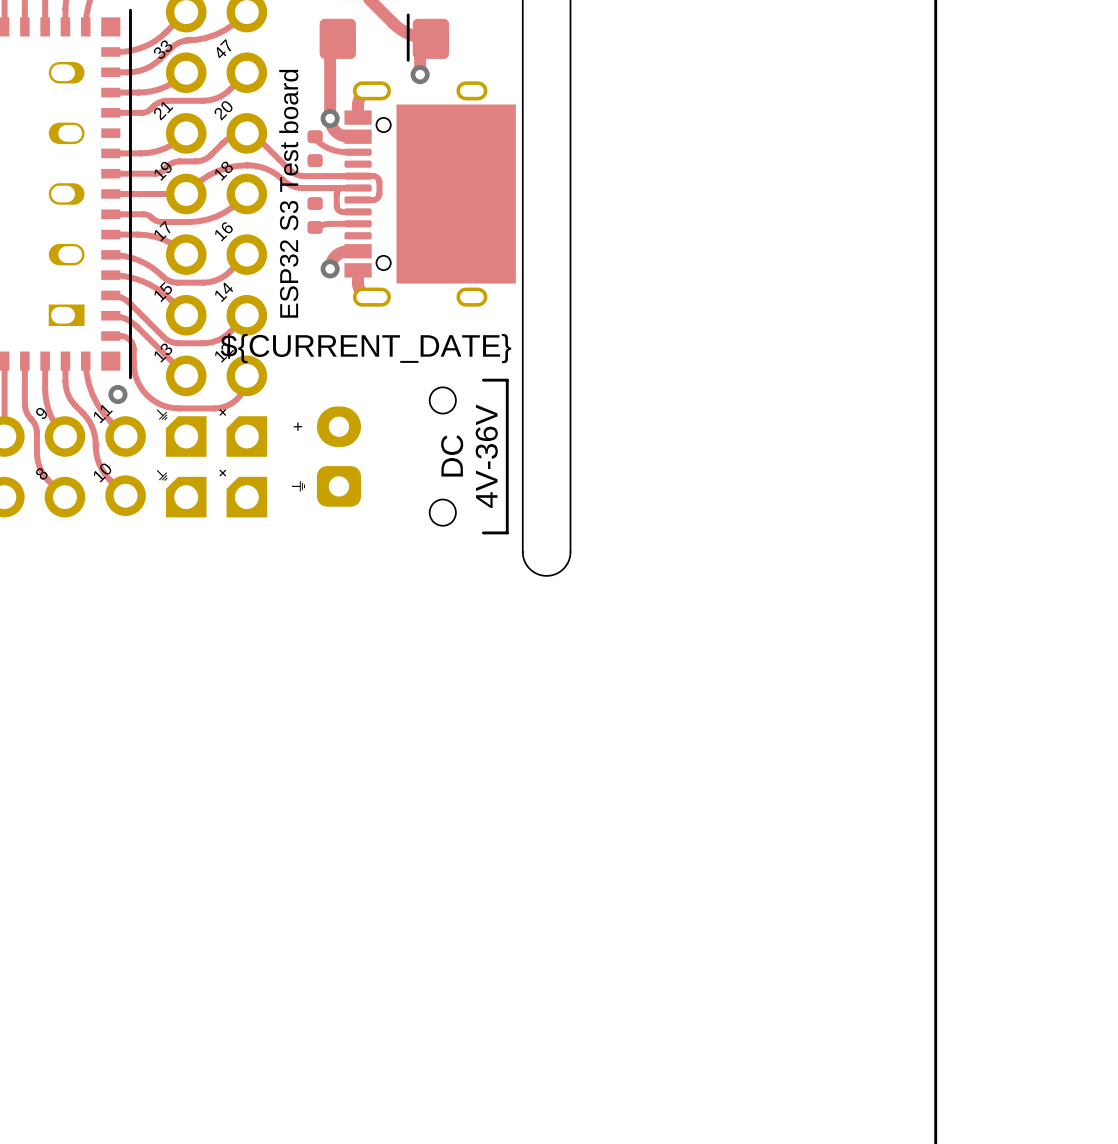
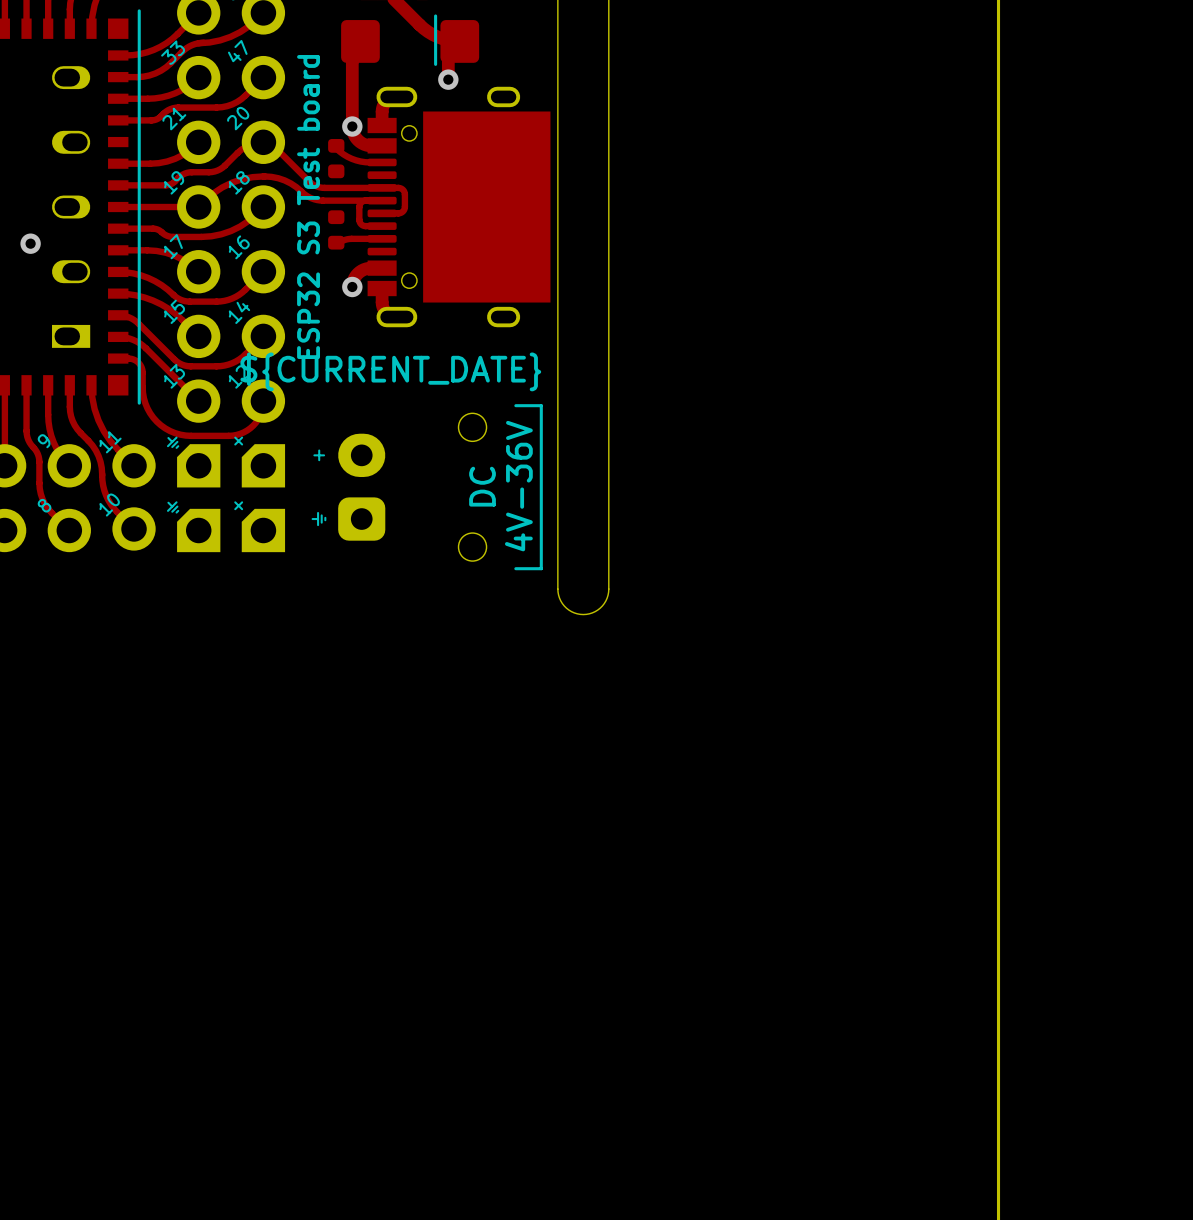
via: none -> (30, 243)
via: (117, 394) -> none

